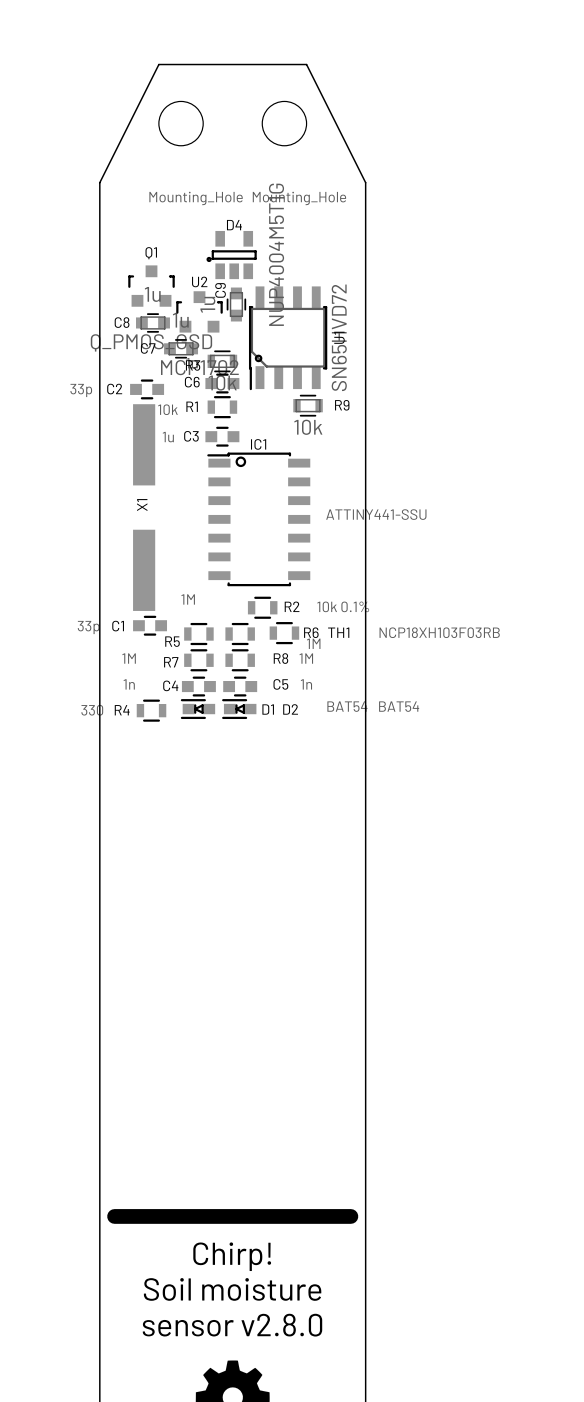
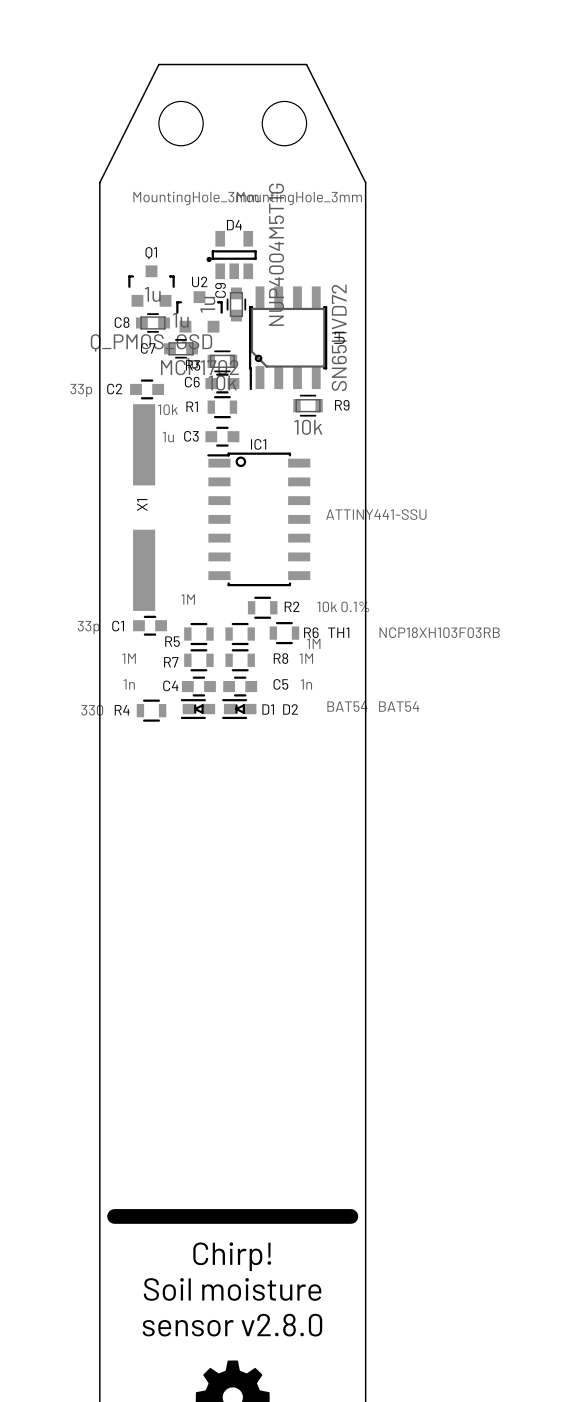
part value: Mounting_Hole (196, 198) -> MountingHole_3mm (195, 198)
part value: Mounting_Hole (299, 198) -> MountingHole_3mm (299, 198)

